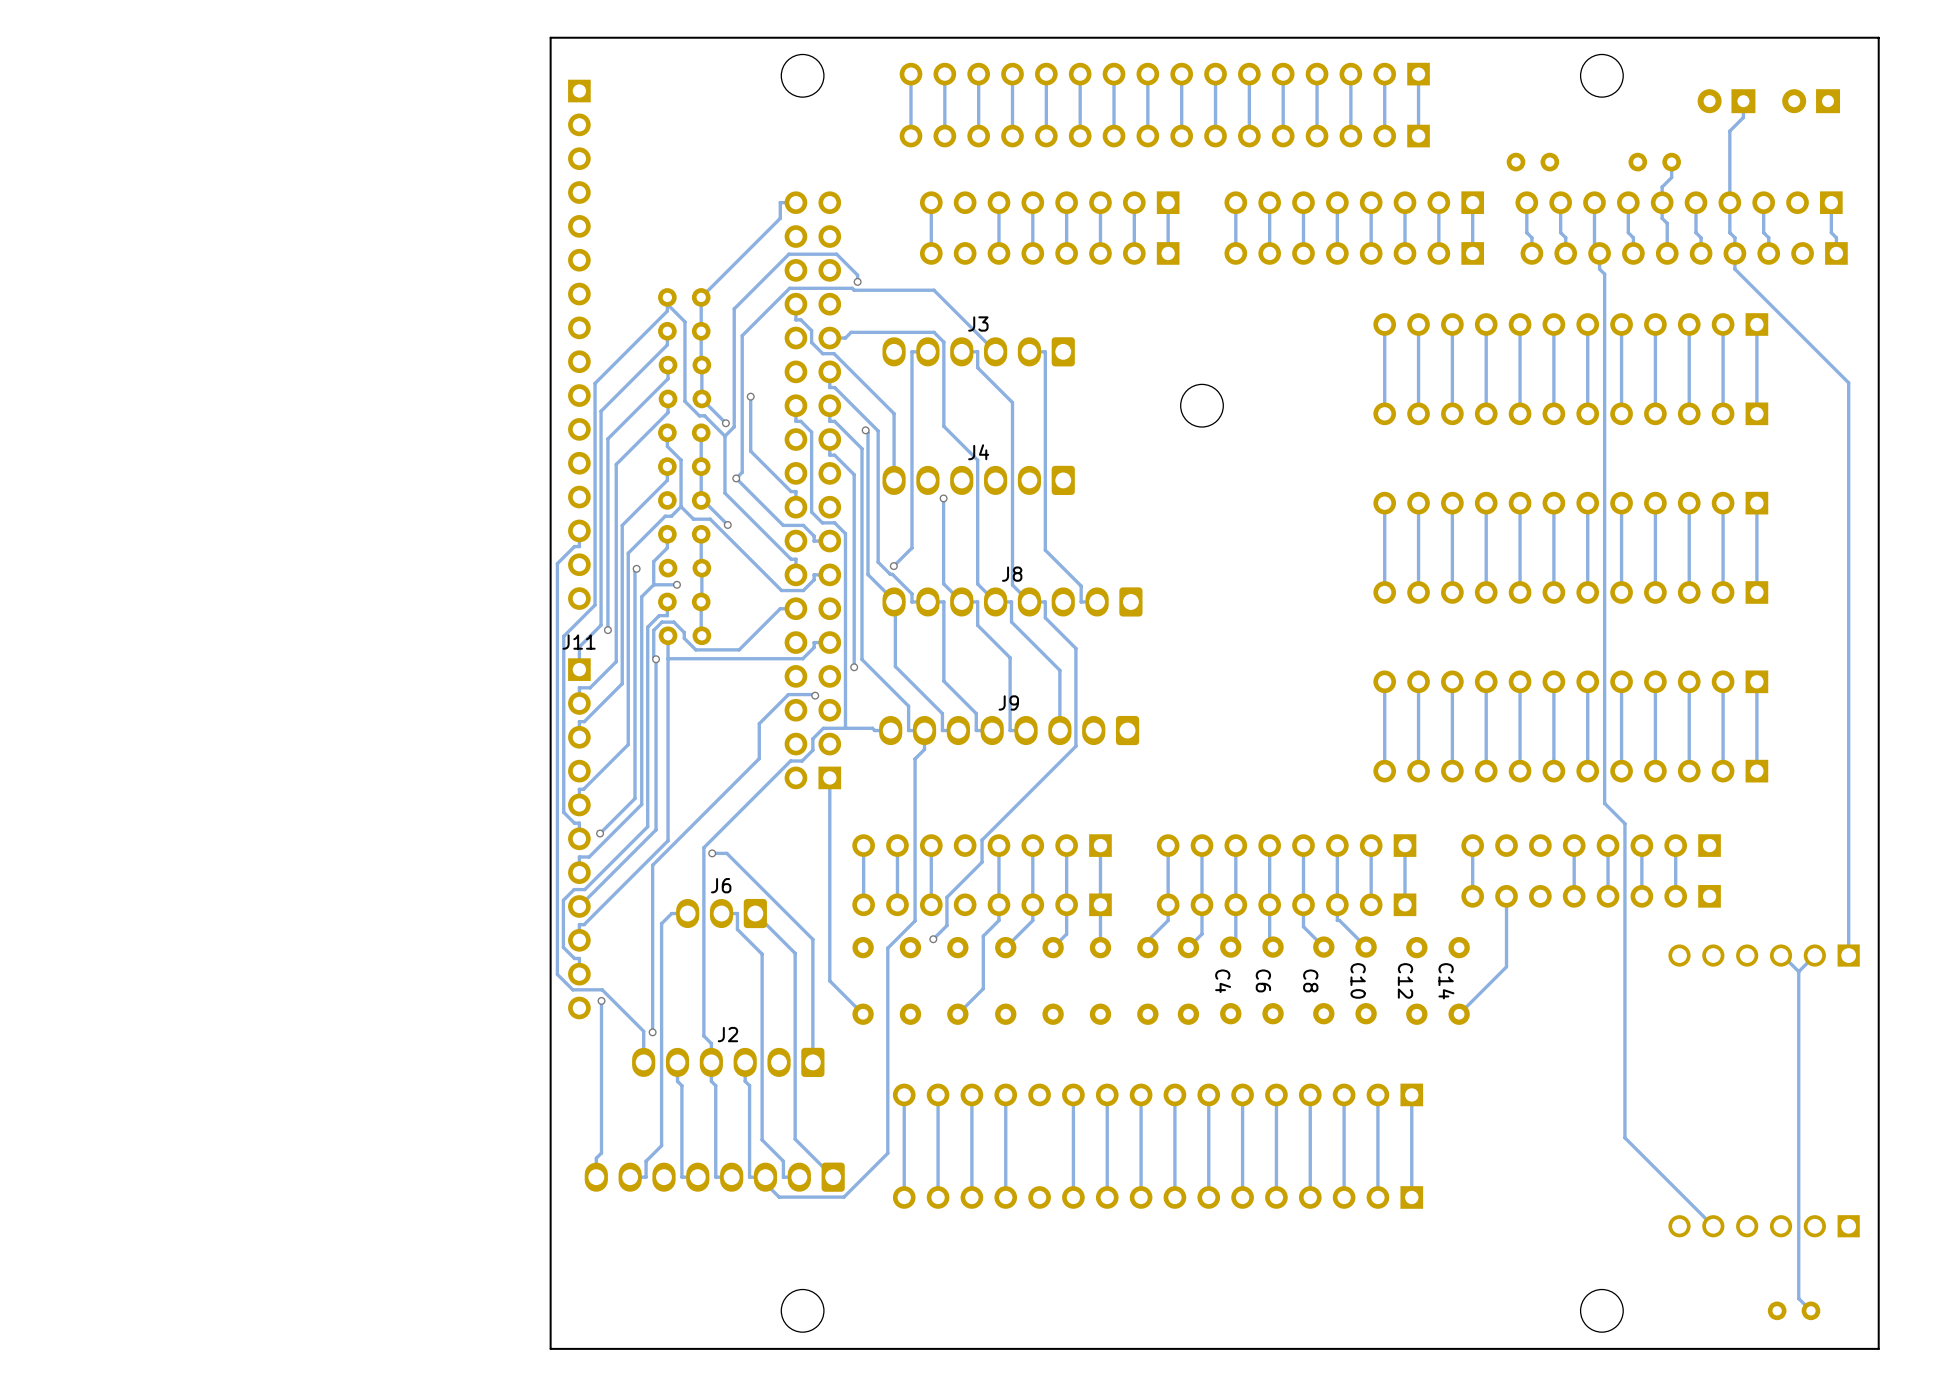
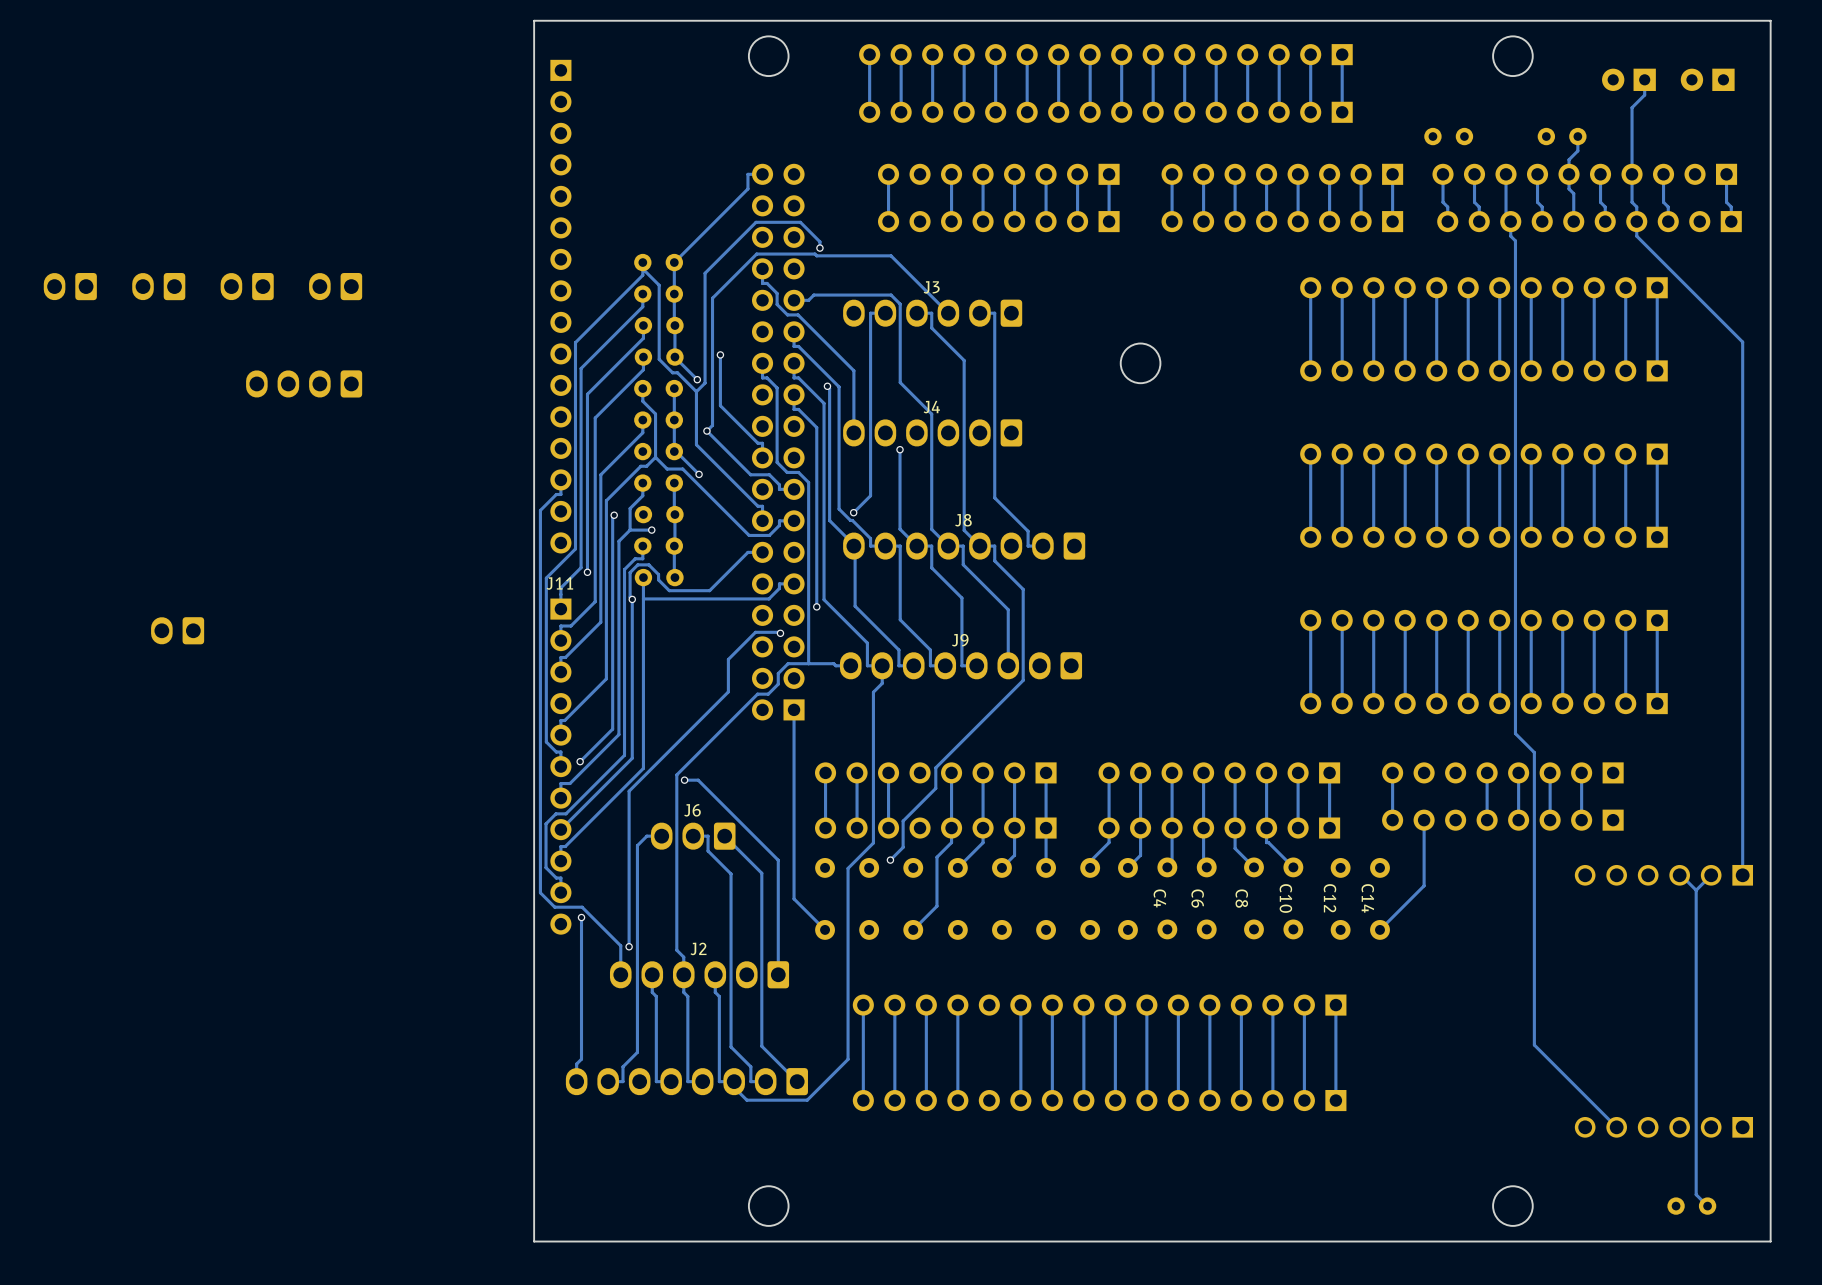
part: none -> (70, 286)
part: none -> (158, 286)
part: none -> (247, 286)
part: none -> (335, 286)
part: none -> (304, 383)
part: none -> (177, 630)

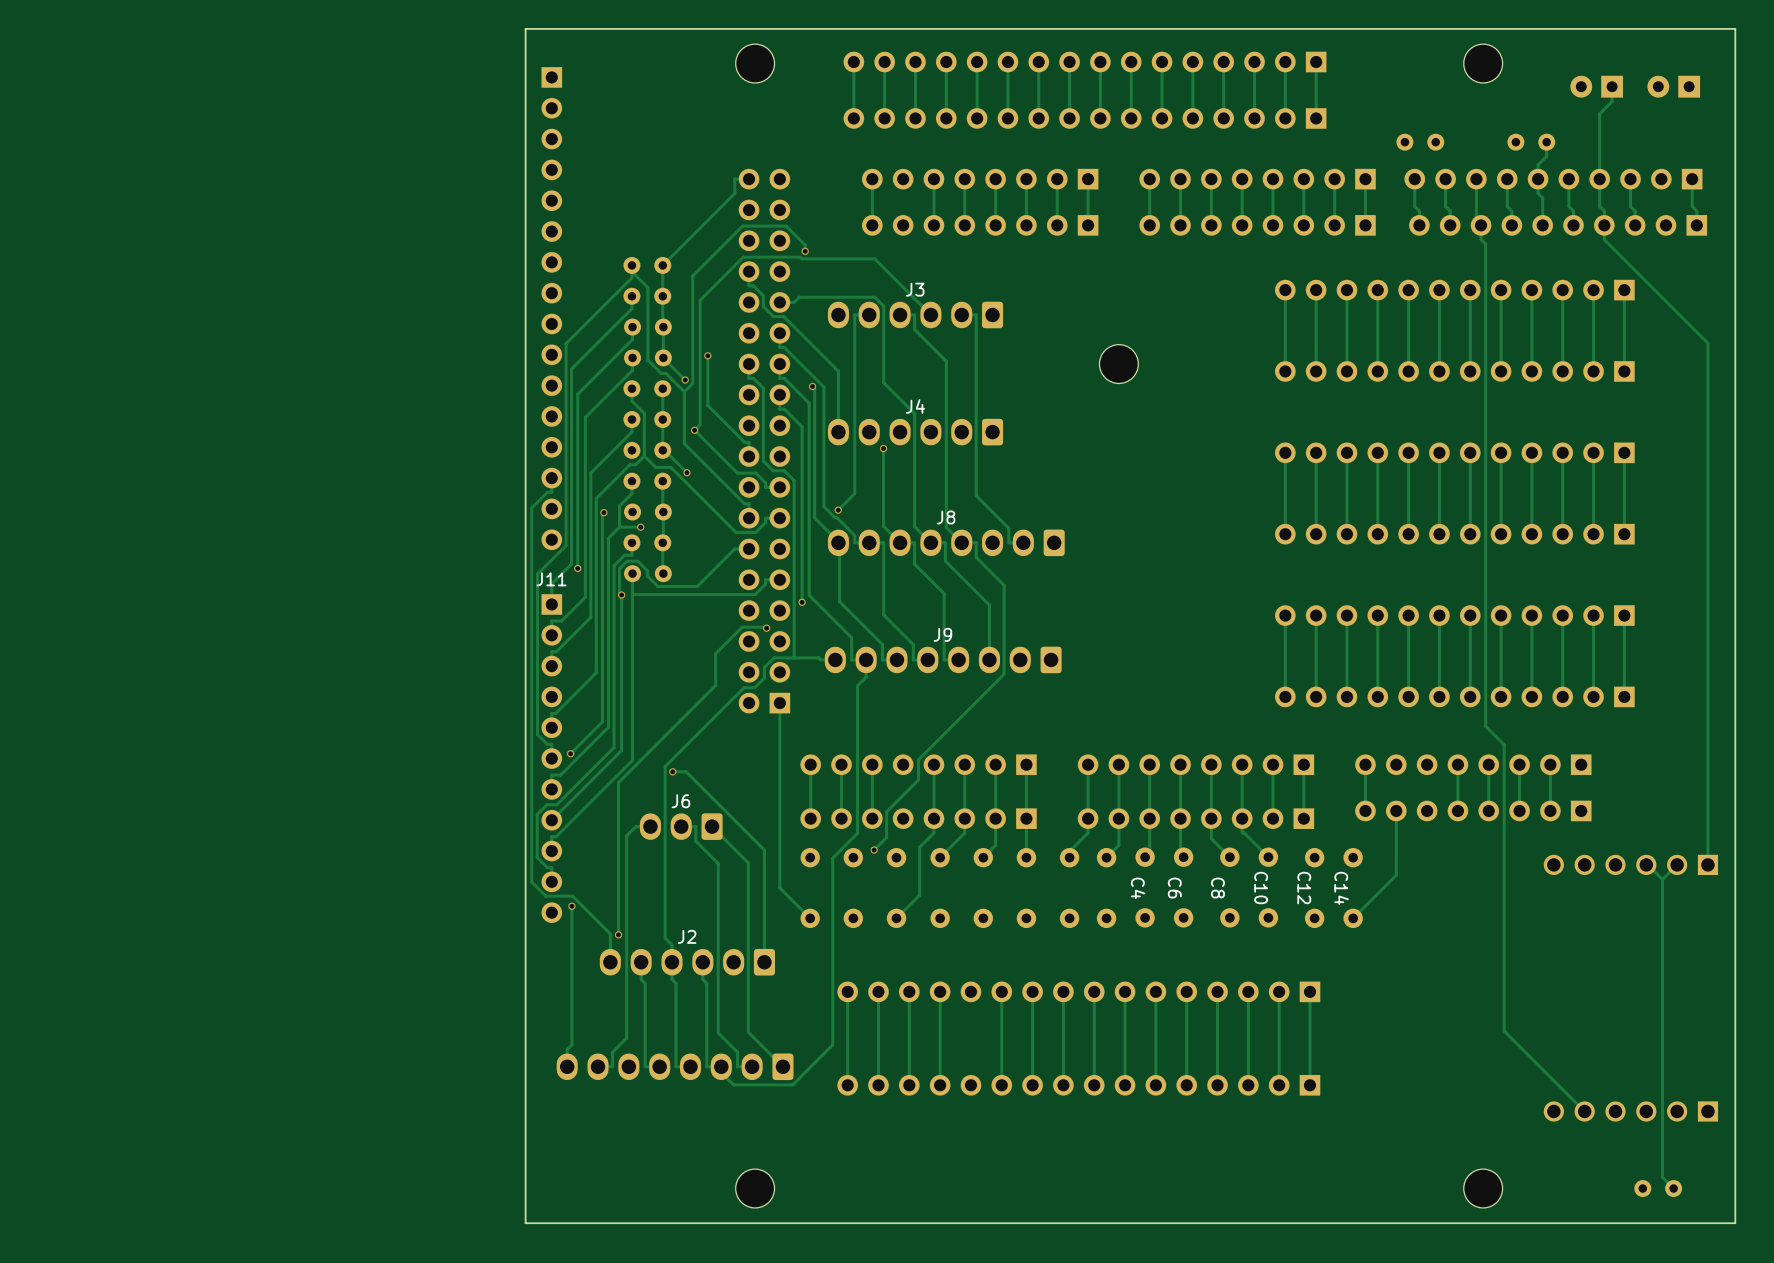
part: (70, 286) -> none
part: (158, 286) -> none
part: (247, 286) -> none
part: (335, 286) -> none
part: (304, 383) -> none
part: (177, 630) -> none

